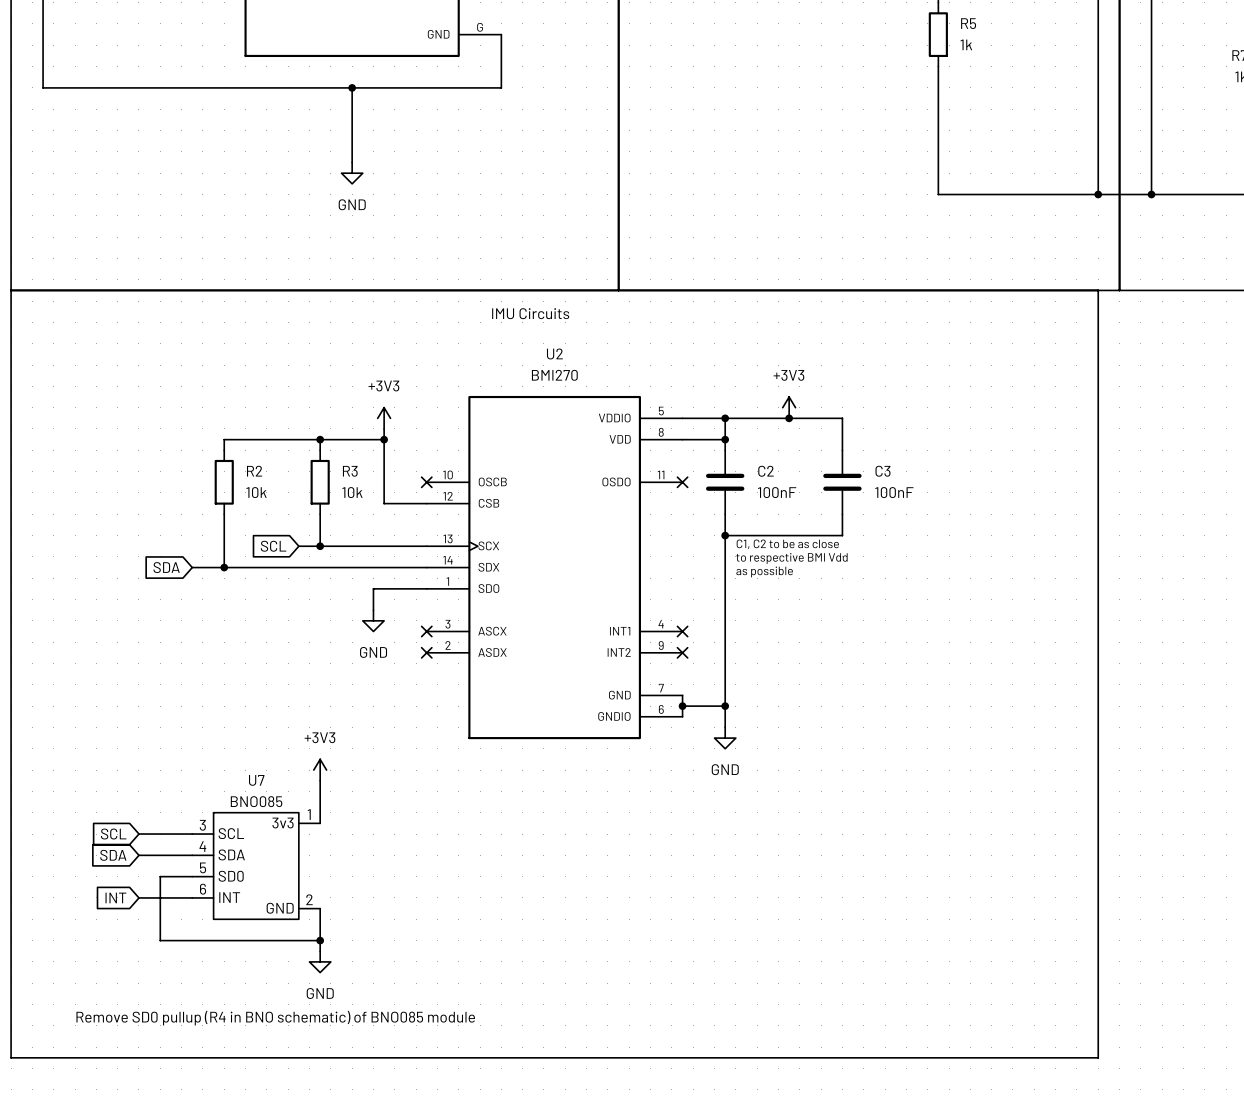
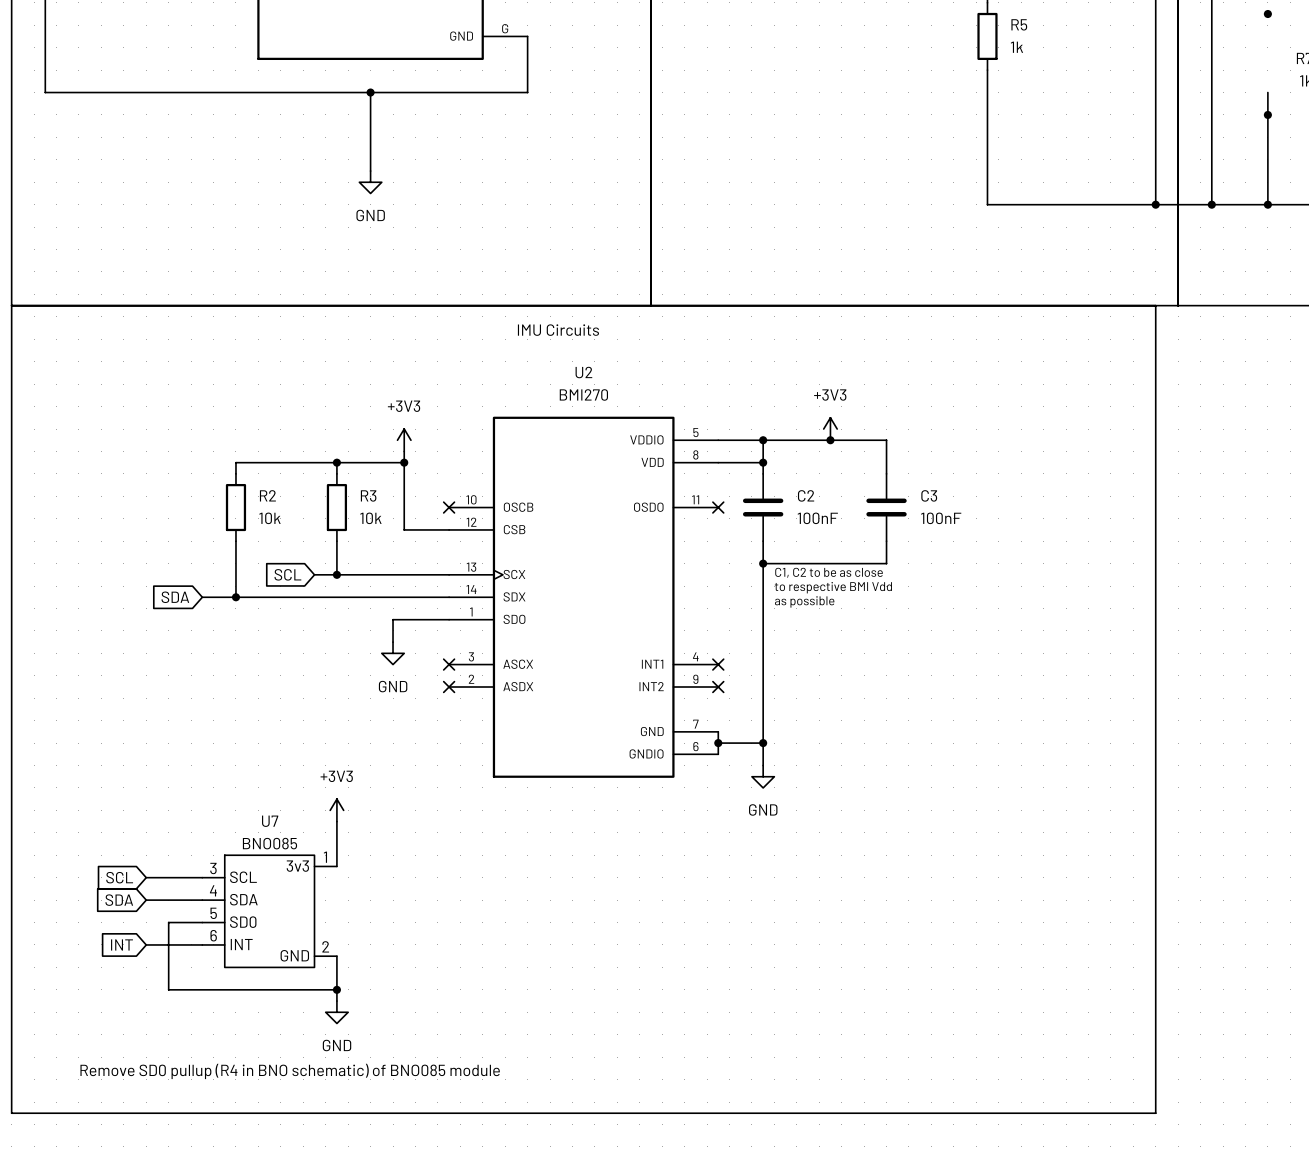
junction: none -> (1267, 14)
wire: none -> (1267, 92) (1267, 204)
junction: none -> (1267, 114)
junction: none -> (1267, 204)

